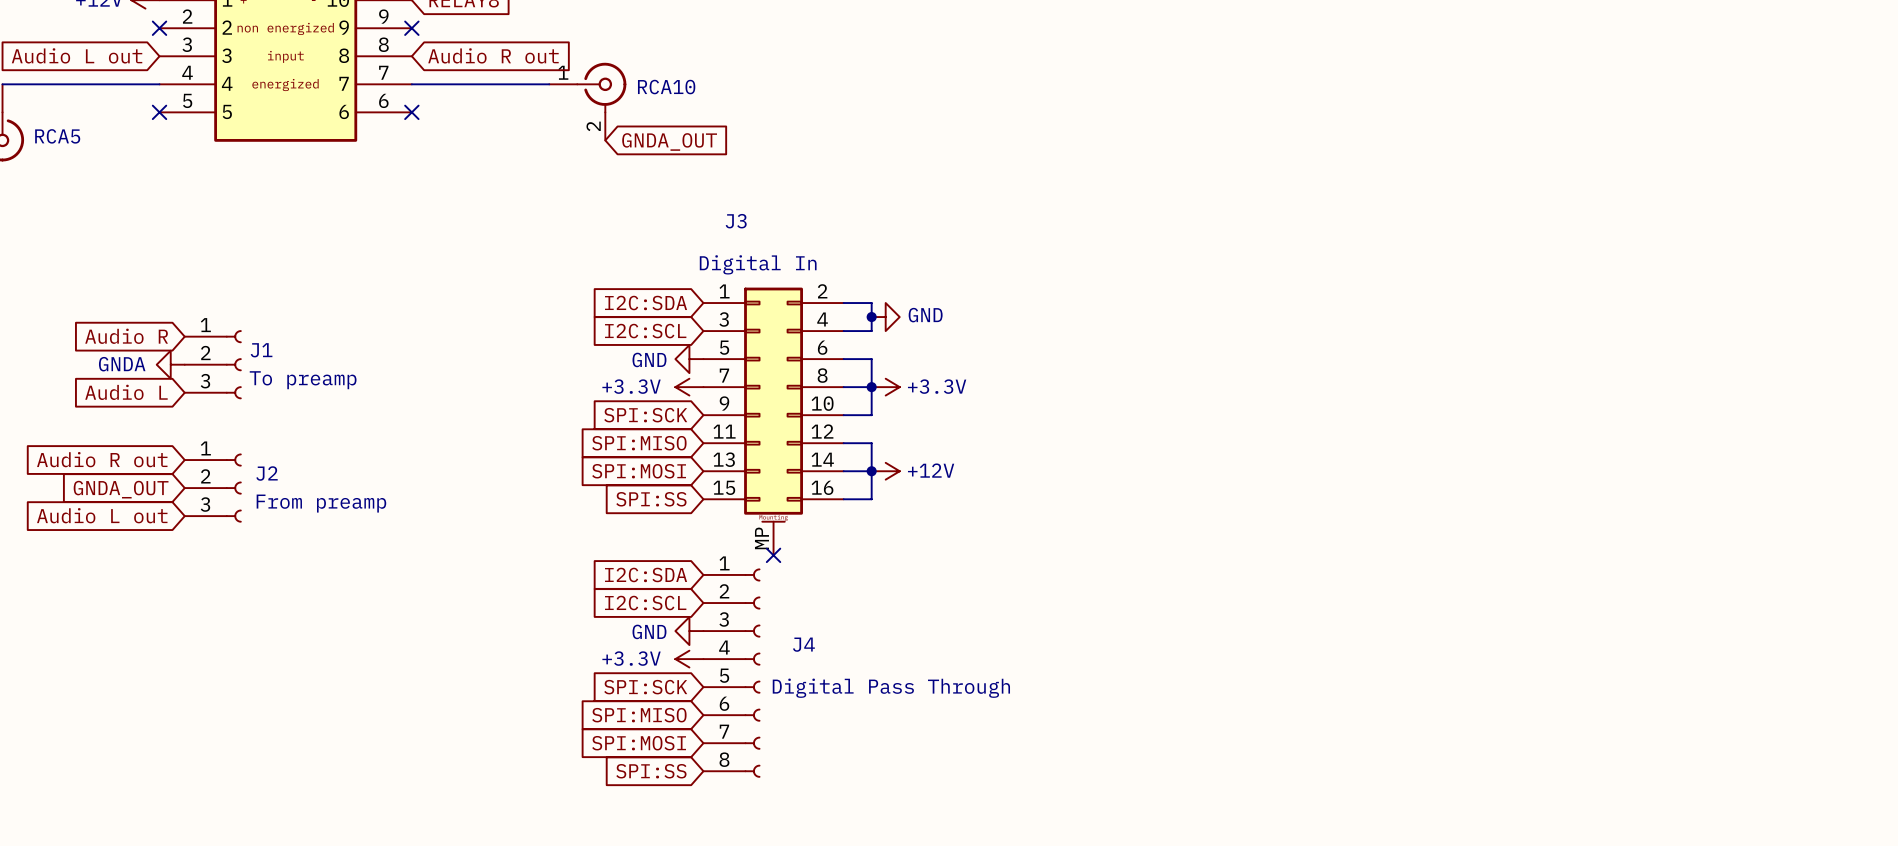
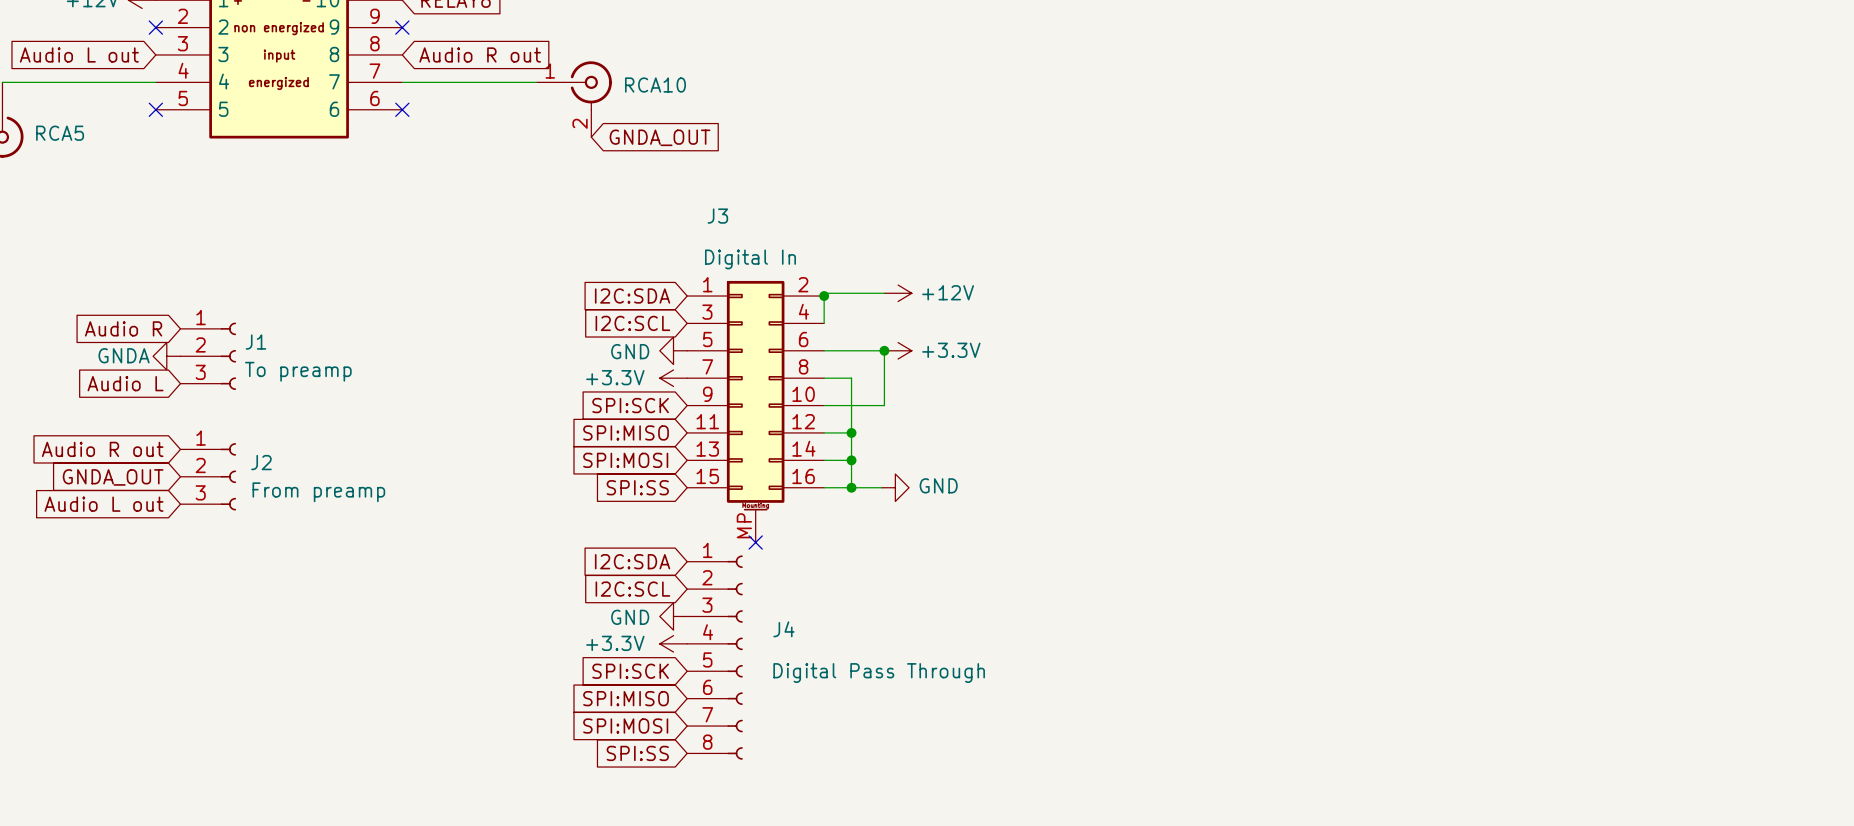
wire: (843, 303) (871, 303) (871, 331) (843, 331) -> (884, 293) (824, 293) (824, 323)
junction: none -> (824, 296)
junction: (871, 317) -> none
power symbol position: GND (885, 317) -> GND (895, 487)
wire: (871, 359) (871, 387) -> (851, 350) (884, 350) (884, 405) (851, 405) (851, 432)
junction: none -> (884, 350)
junction: (871, 387) -> none
power symbol position: +3.3V (885, 387) -> +3.3V (898, 350)
junction: none -> (851, 432)
power symbol position: +12V (885, 471) -> +12V (898, 293)
wire: none -> (851, 487) (881, 487)
junction: none -> (851, 487)

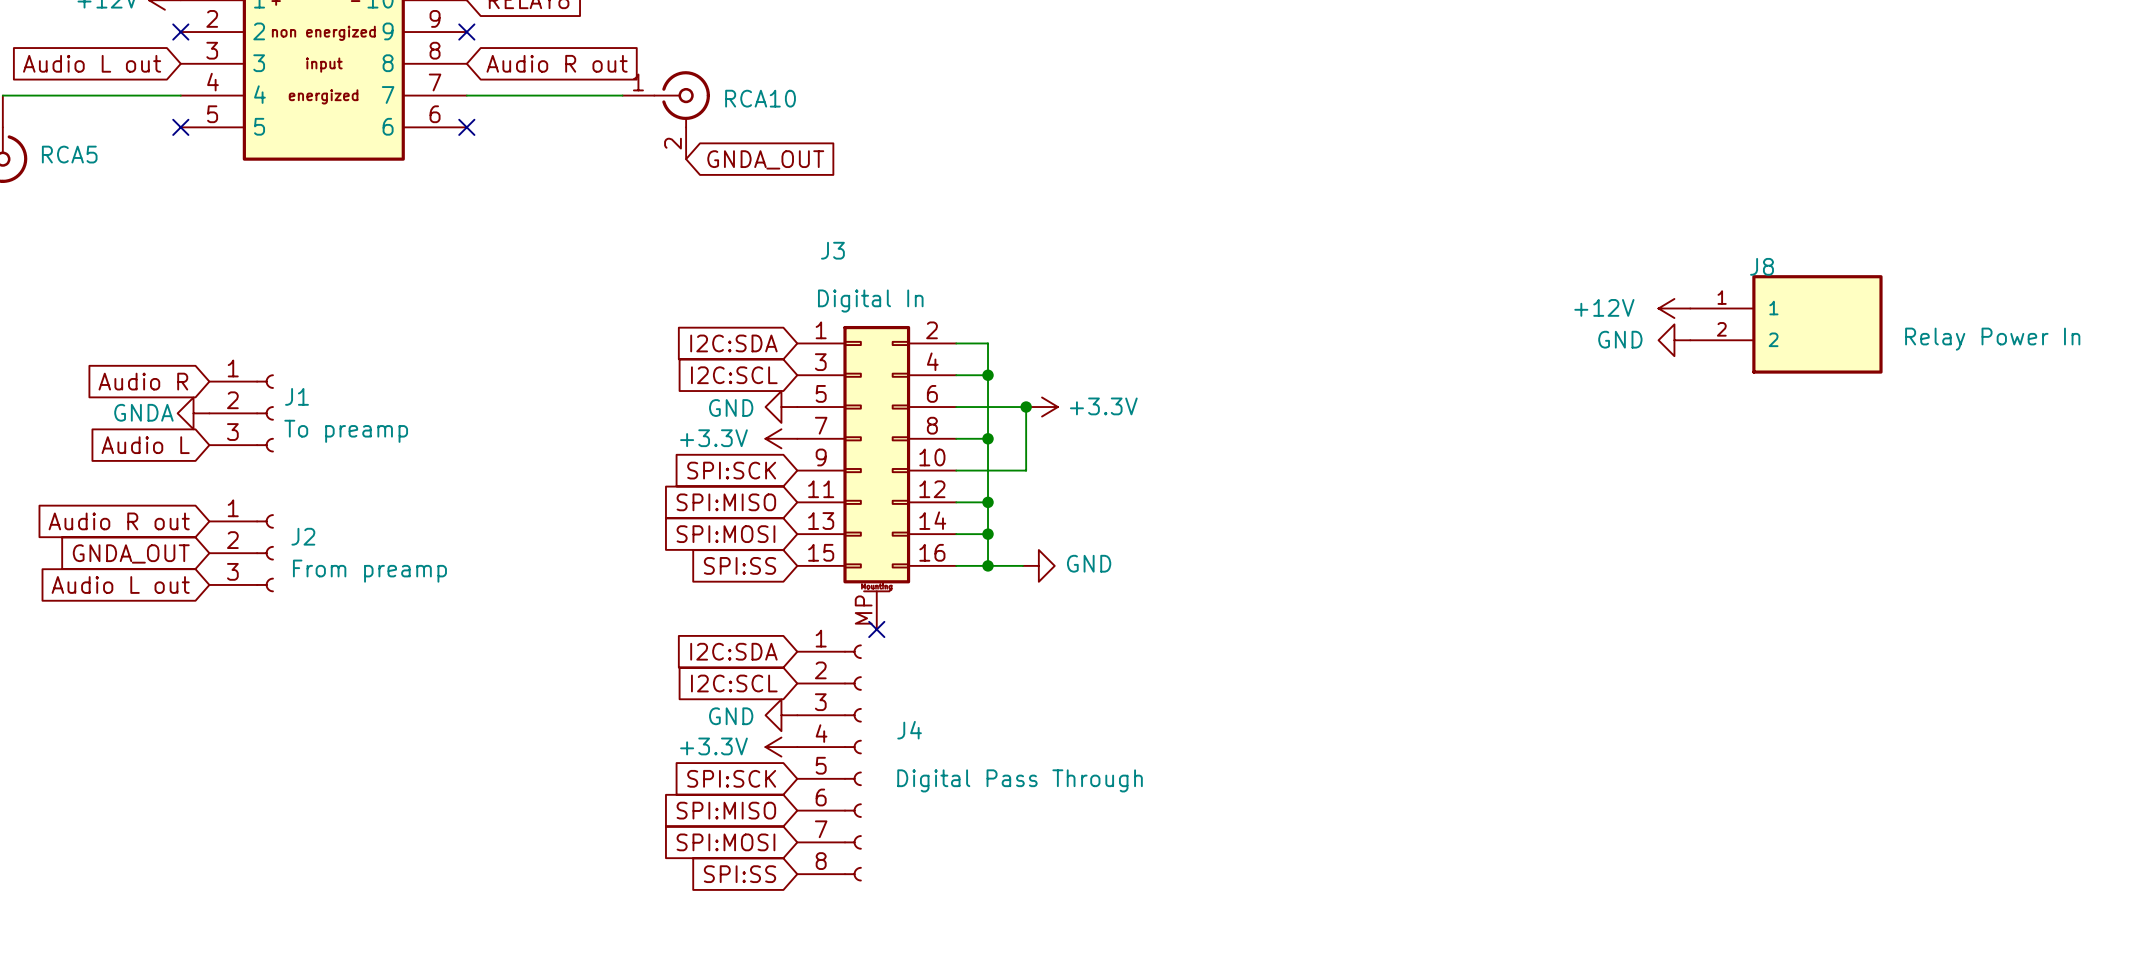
power symbol: none -> +12V (1674, 308)
J8: none -> Relay Power In (1786, 324)
wire: (884, 293) (824, 293) (824, 323) -> (988, 375) (956, 375)
power symbol: +12V (898, 293) -> none
power symbol: none -> GND (1674, 340)
wire: none -> (956, 343) (988, 343) (988, 438)
junction position: (824, 296) -> (988, 375)
junction: none -> (988, 438)

